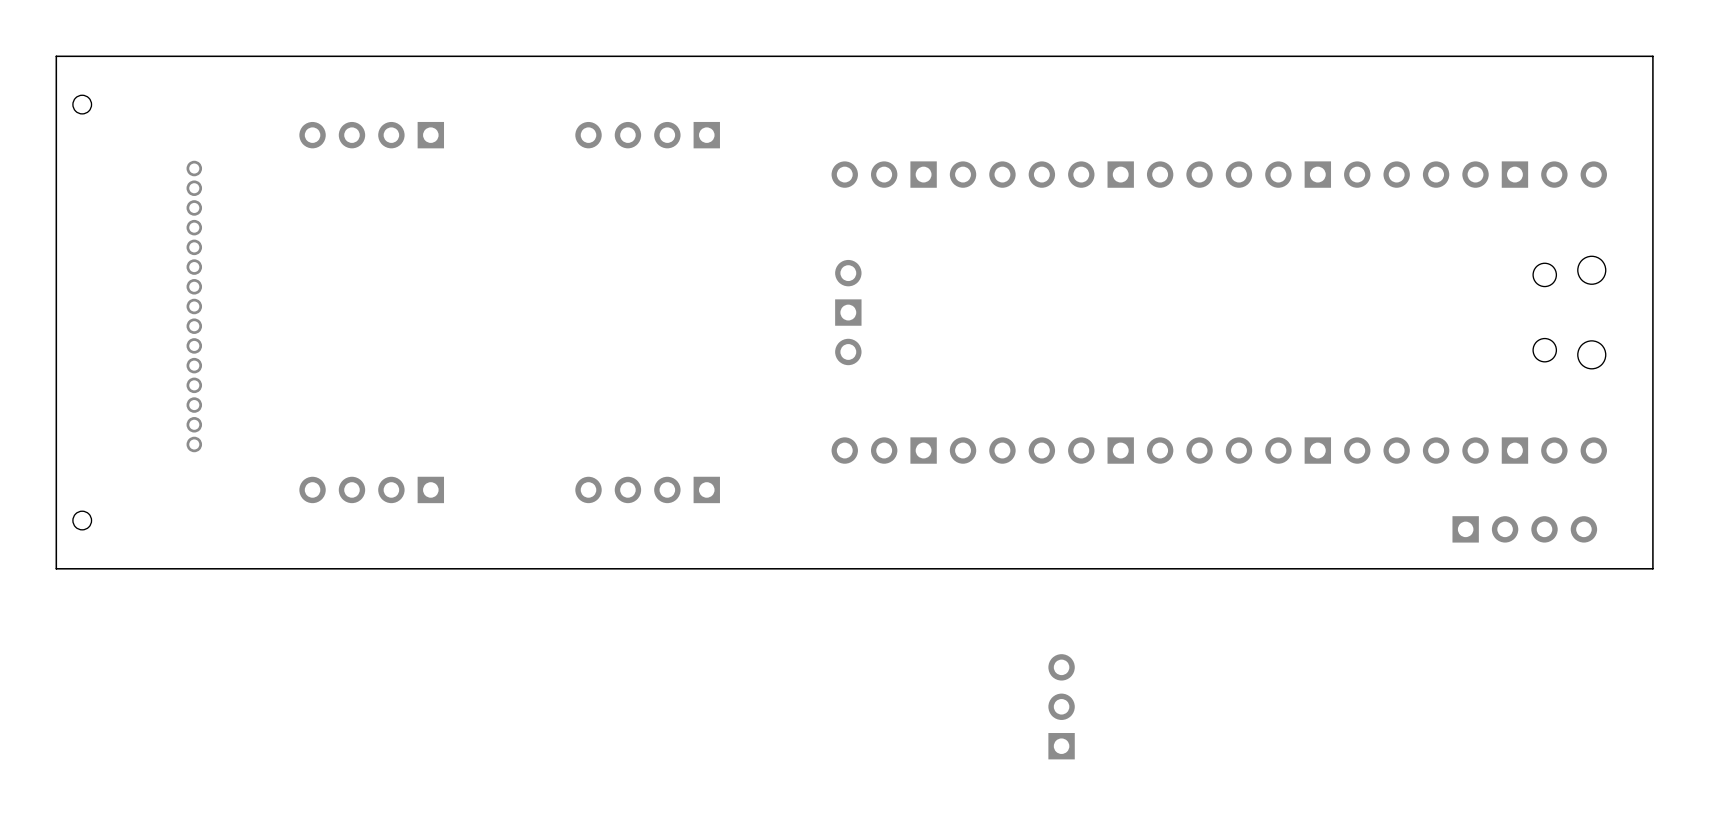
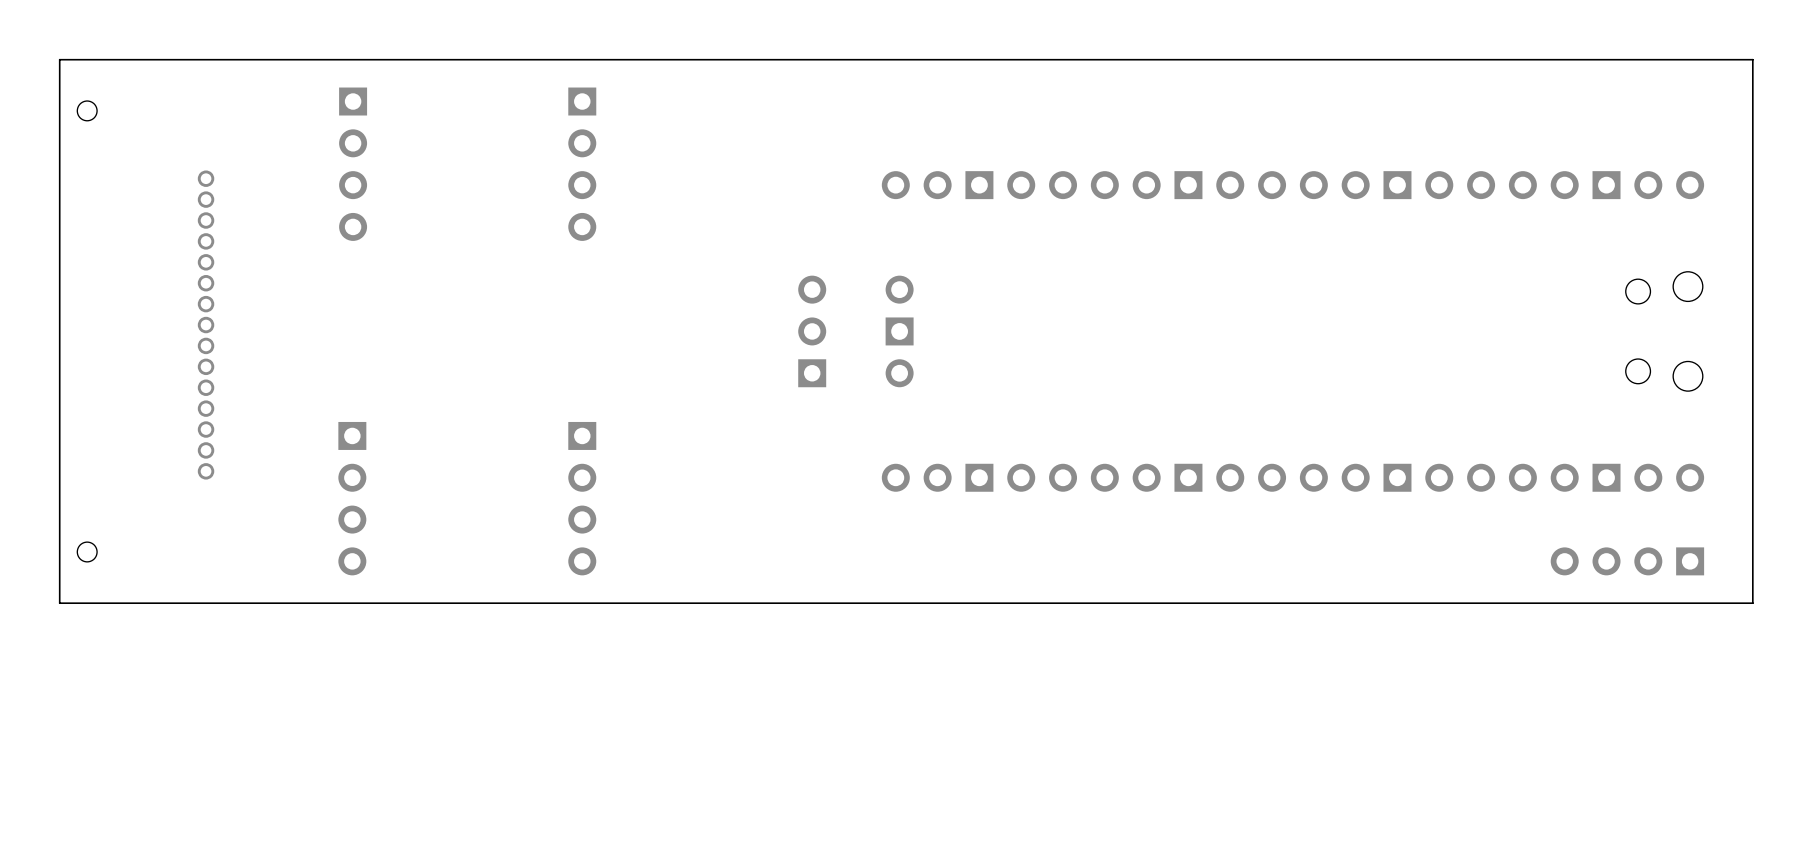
part rotation: 0° (371, 135) -> 90° counterclockwise (353, 164)
part: (647, 135) -> none
part: none -> (582, 164)
part: none -> (812, 331)
part: none -> (582, 498)
part rotation: 0° (371, 489) -> 90° counterclockwise (352, 498)
part: (647, 489) -> none
part rotation: 0° (1524, 529) -> 180° (1627, 561)
part: (1061, 706) -> none

